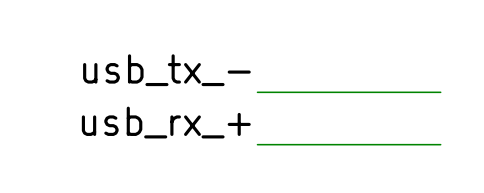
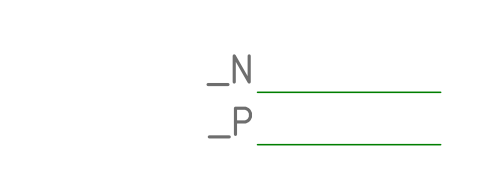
label: usb_tx_- (166, 70) -> _N (228, 70)
label: usb_rx_+ (166, 122) -> _P (229, 122)

